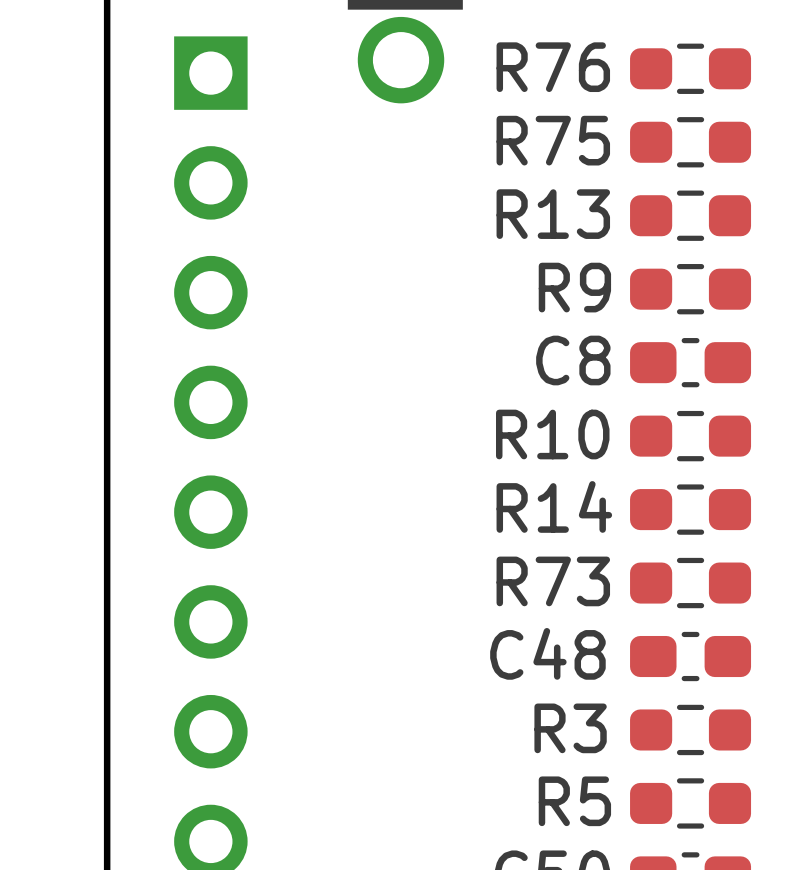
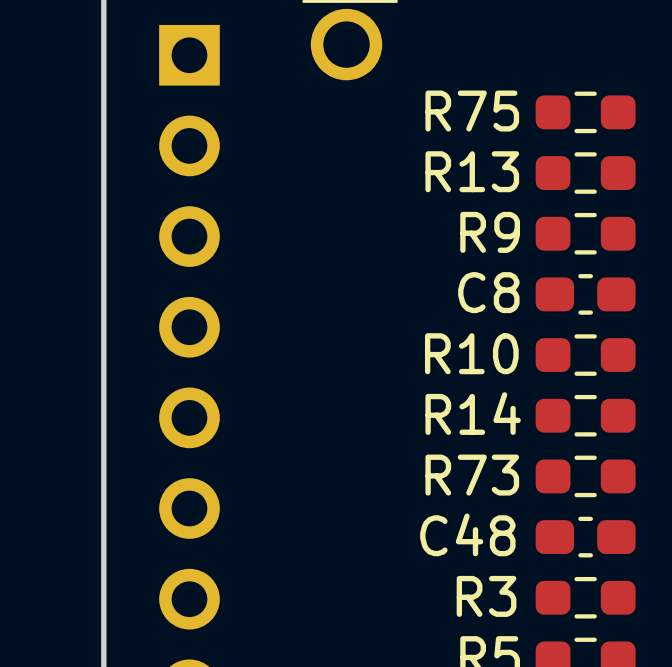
R76: (690, 68) -> none

